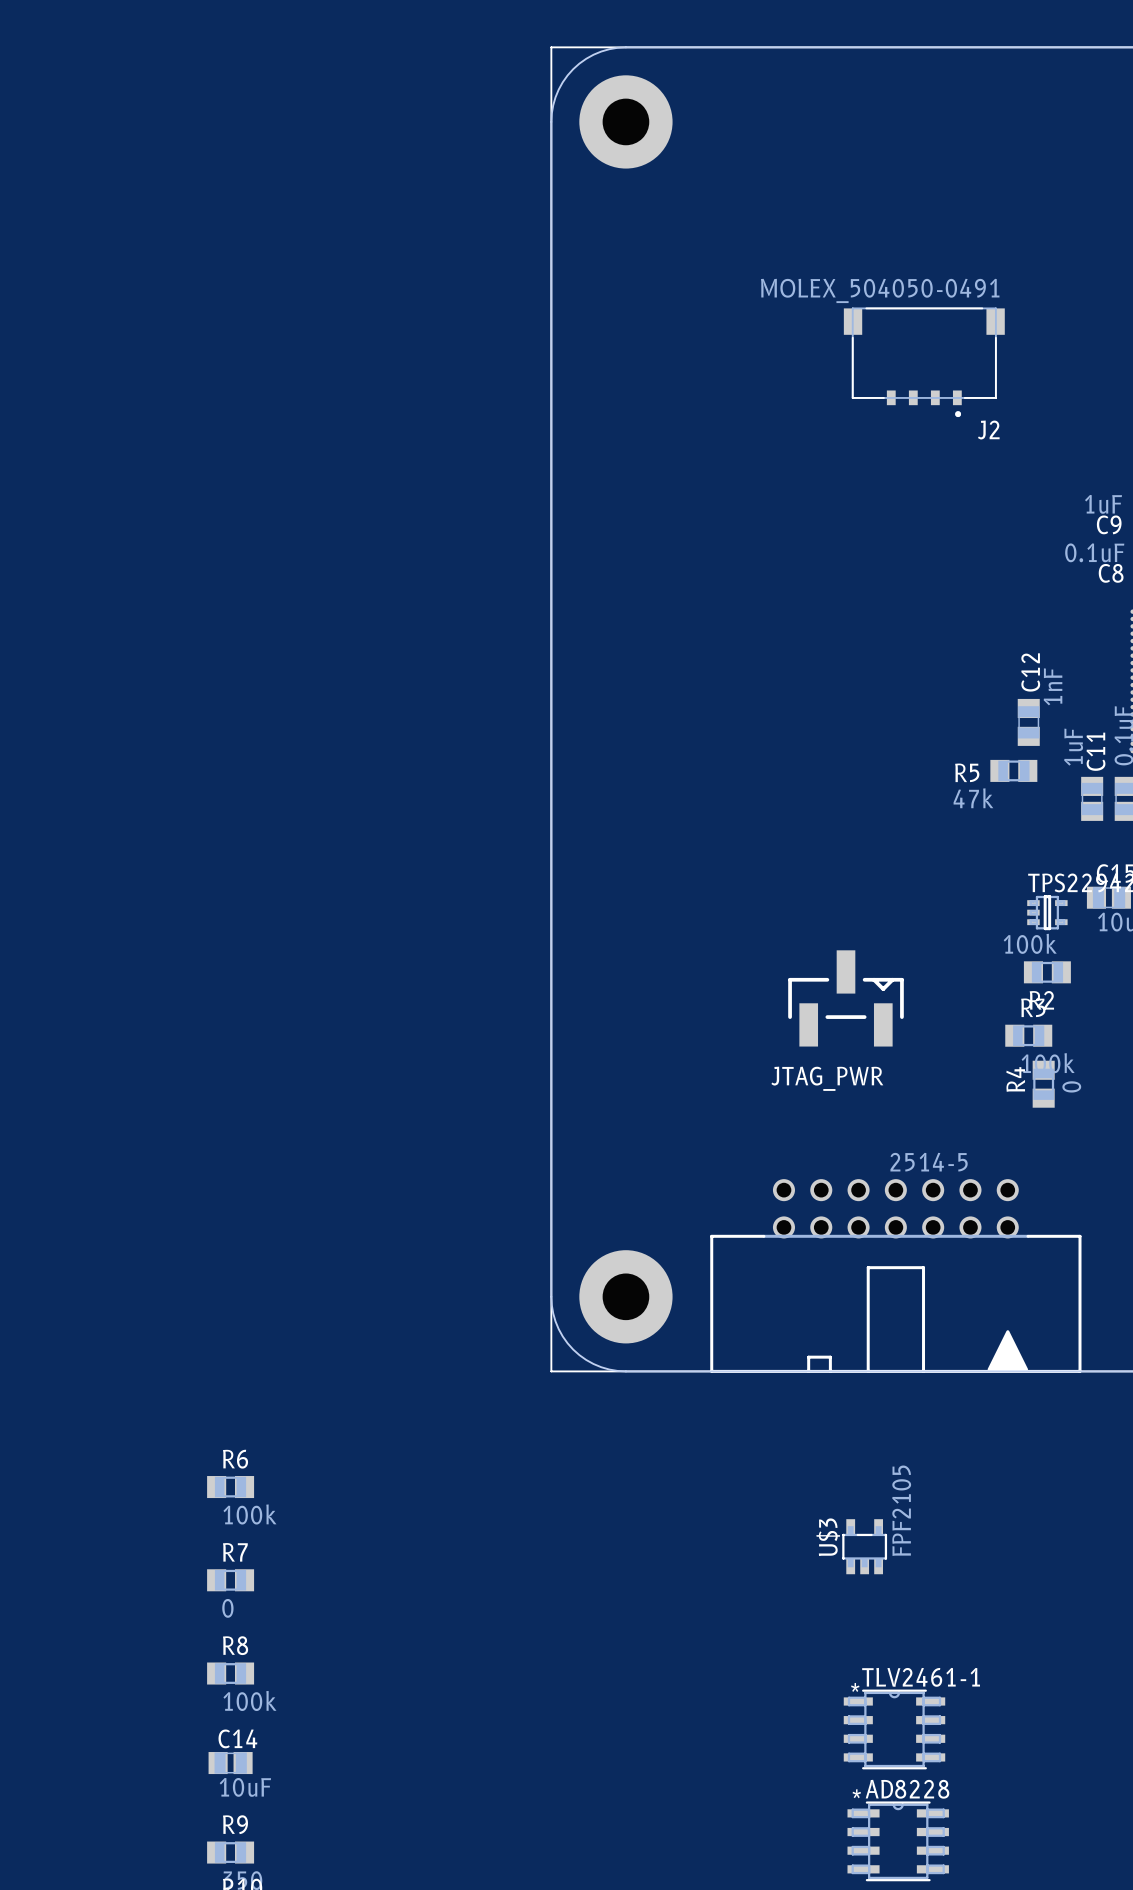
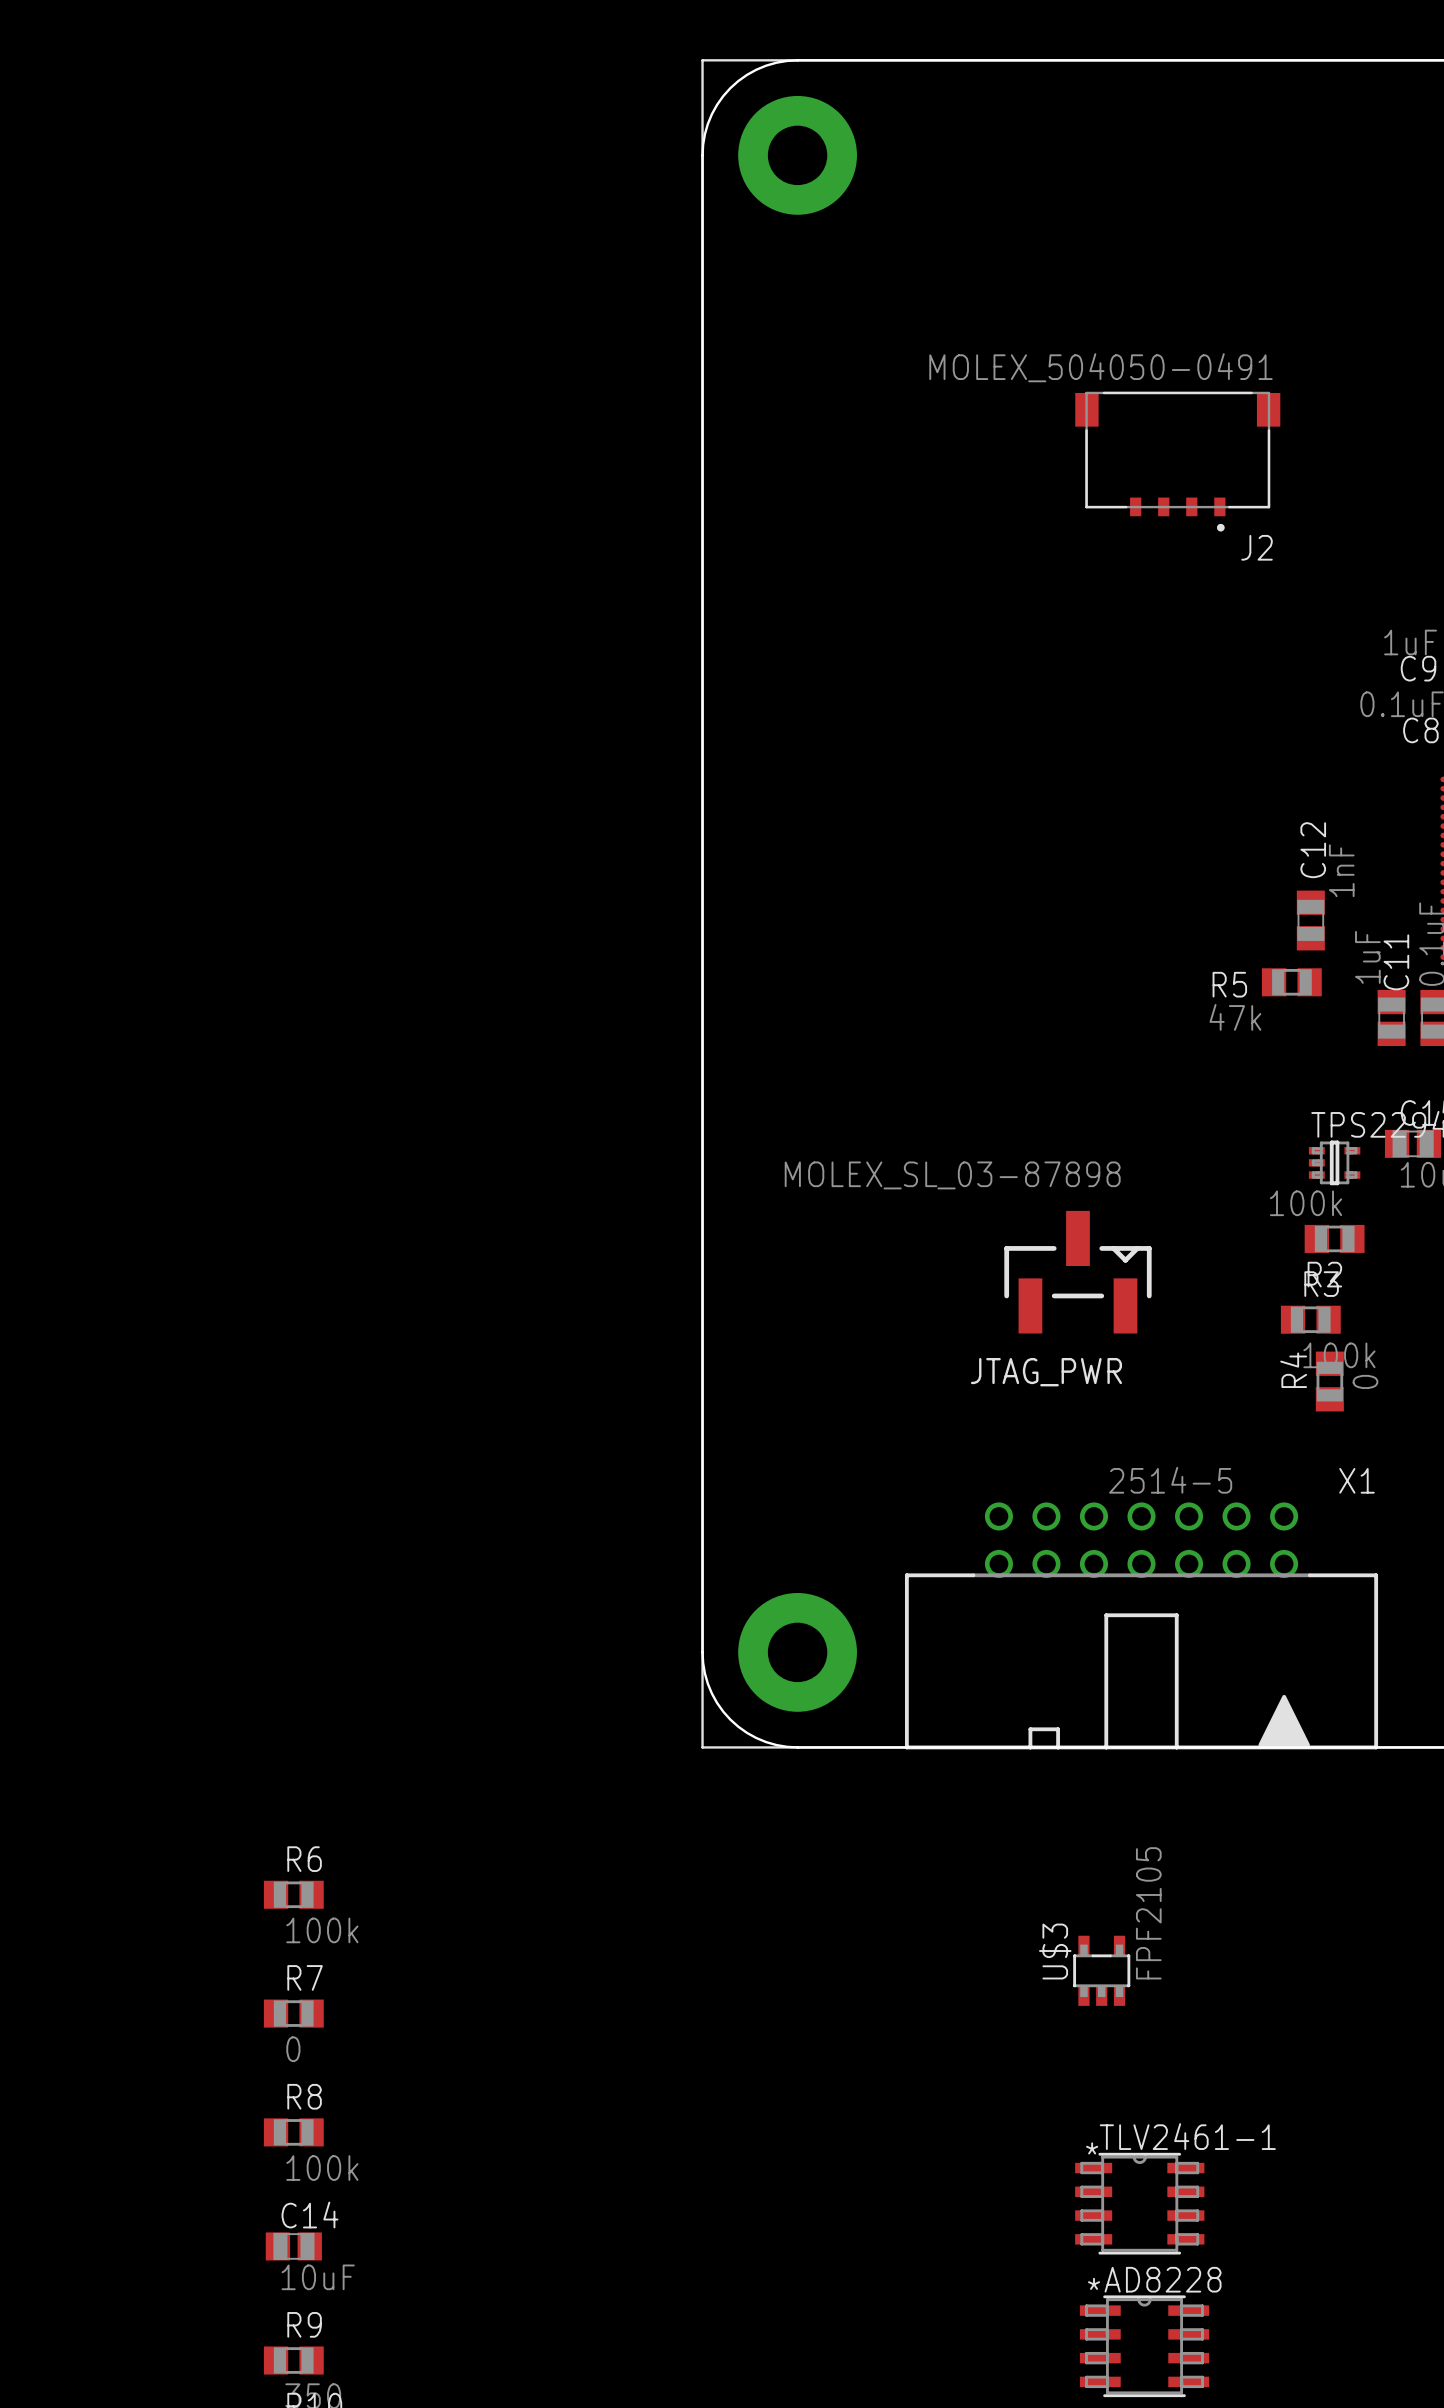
JTAG_PWR value: none -> MOLEX_SL_03-87898 (952, 1175)
X1 name: none -> X1 (1357, 1480)

